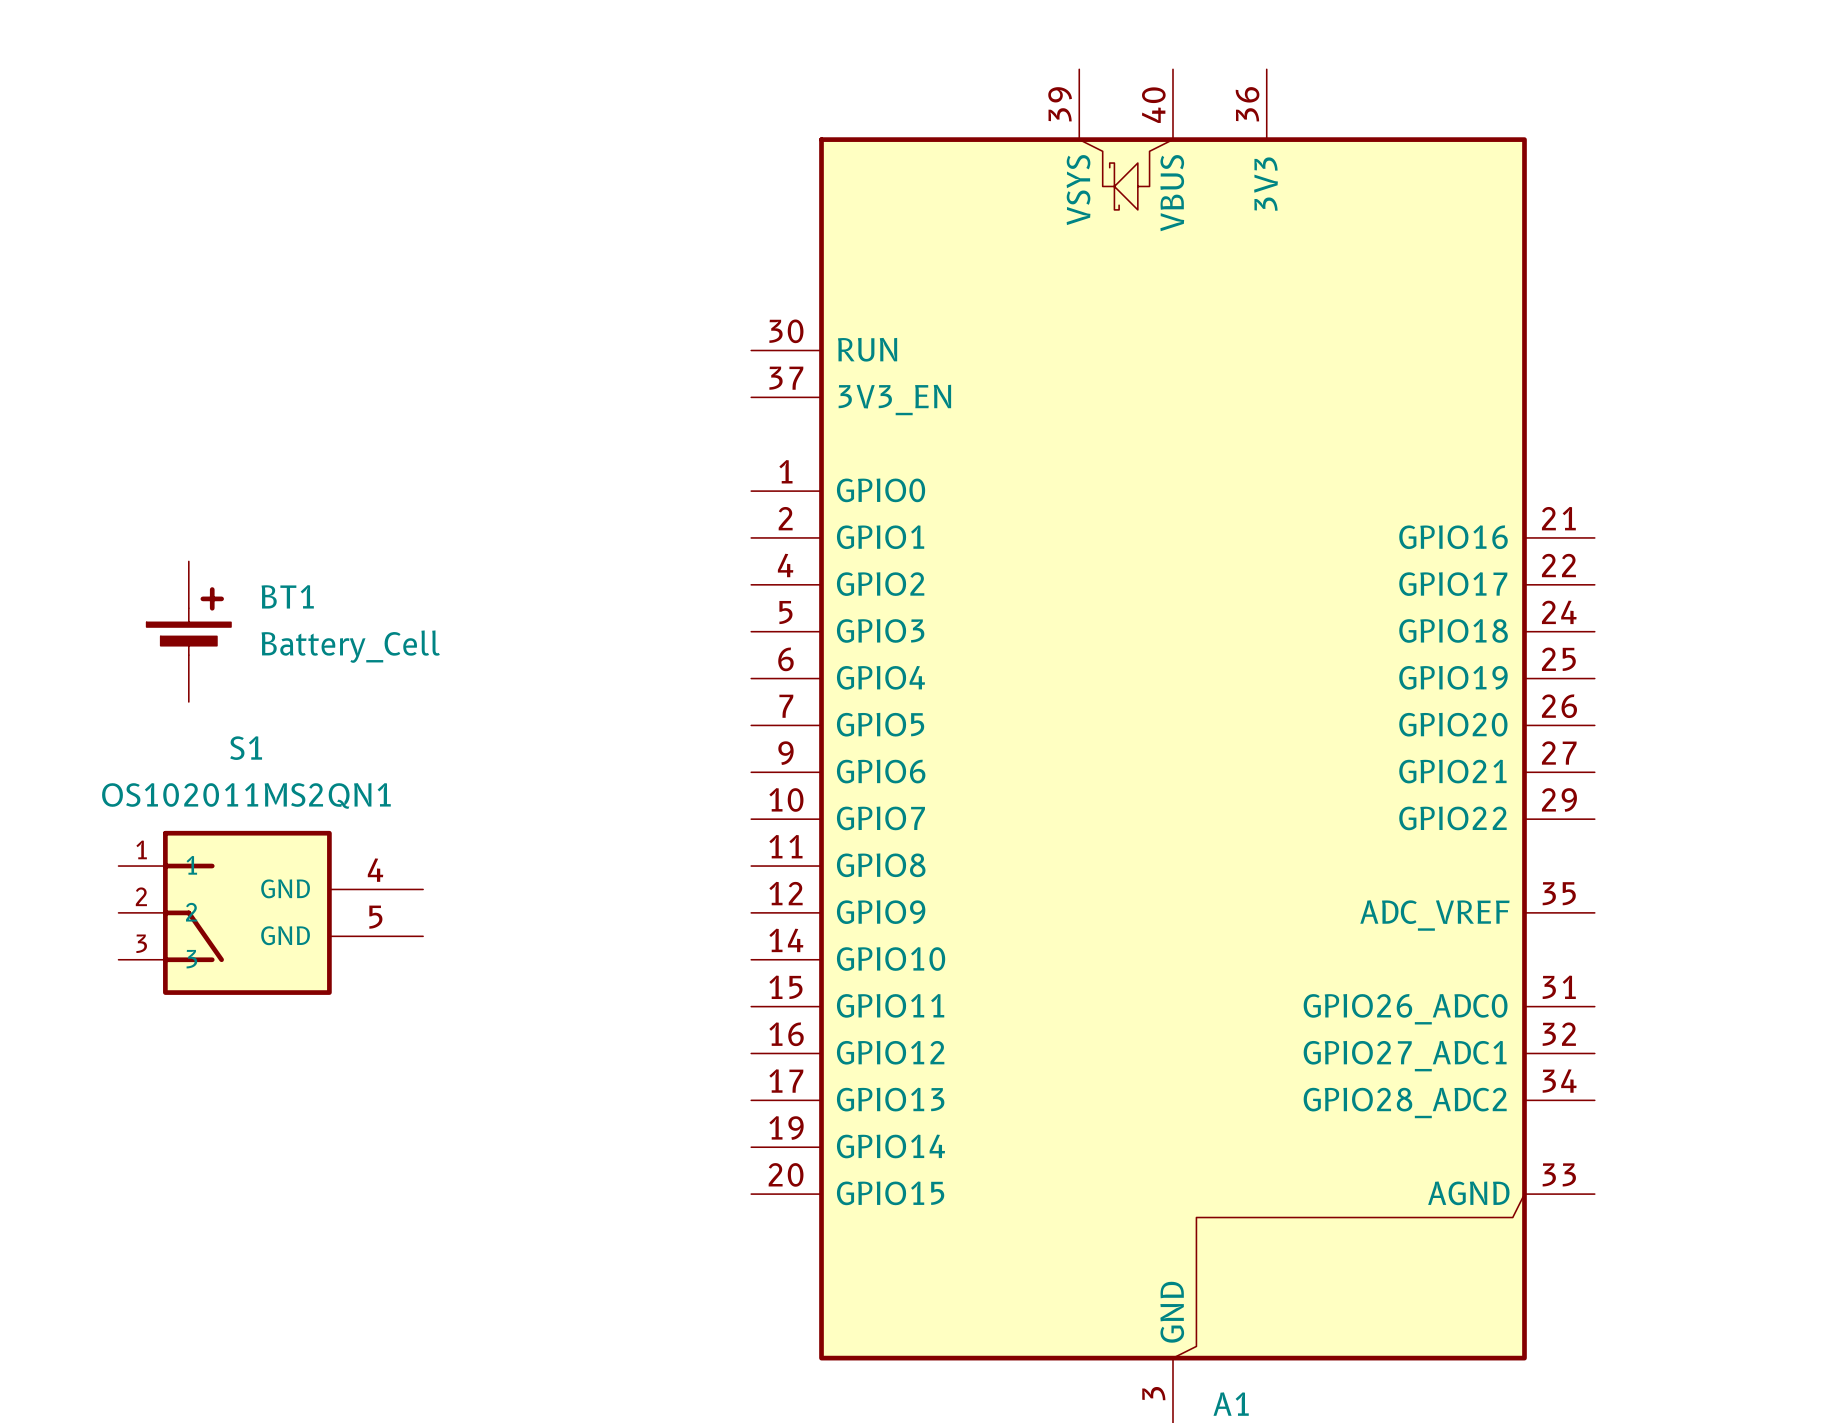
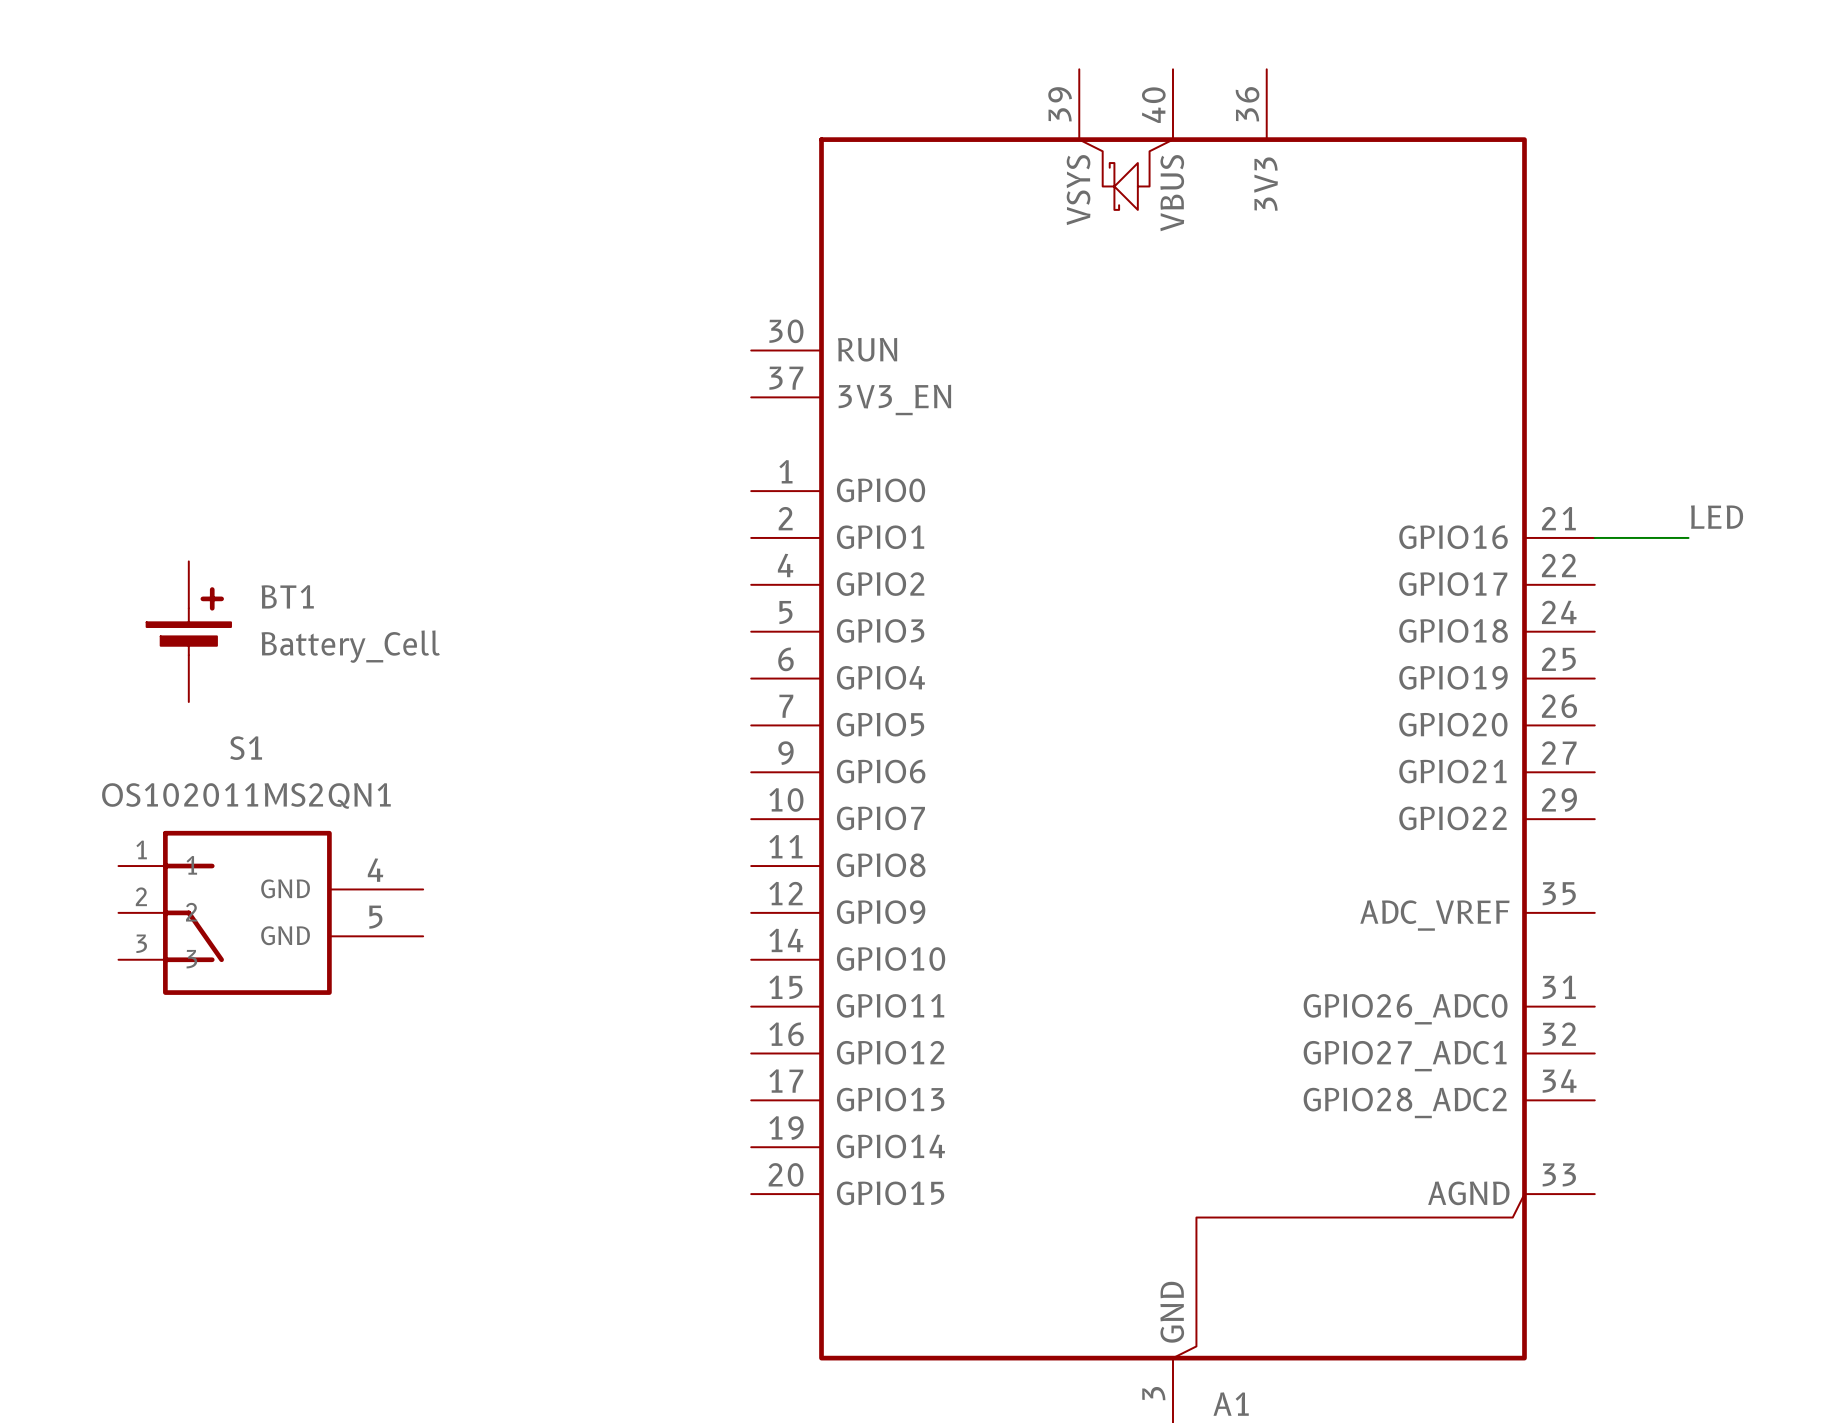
label: none -> LED (1717, 517)
wire: none -> (1594, 537) (1688, 537)

